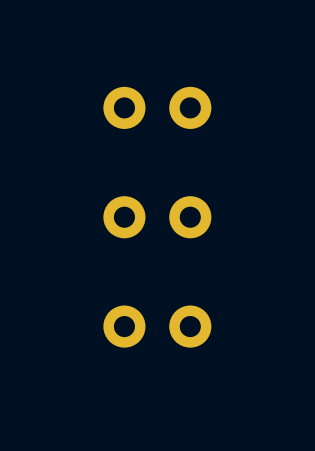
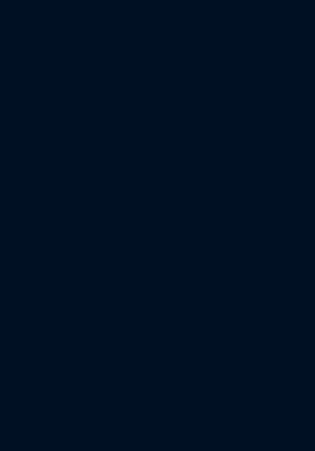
part: (157, 107) -> none
part: (157, 217) -> none
part: (157, 326) -> none

